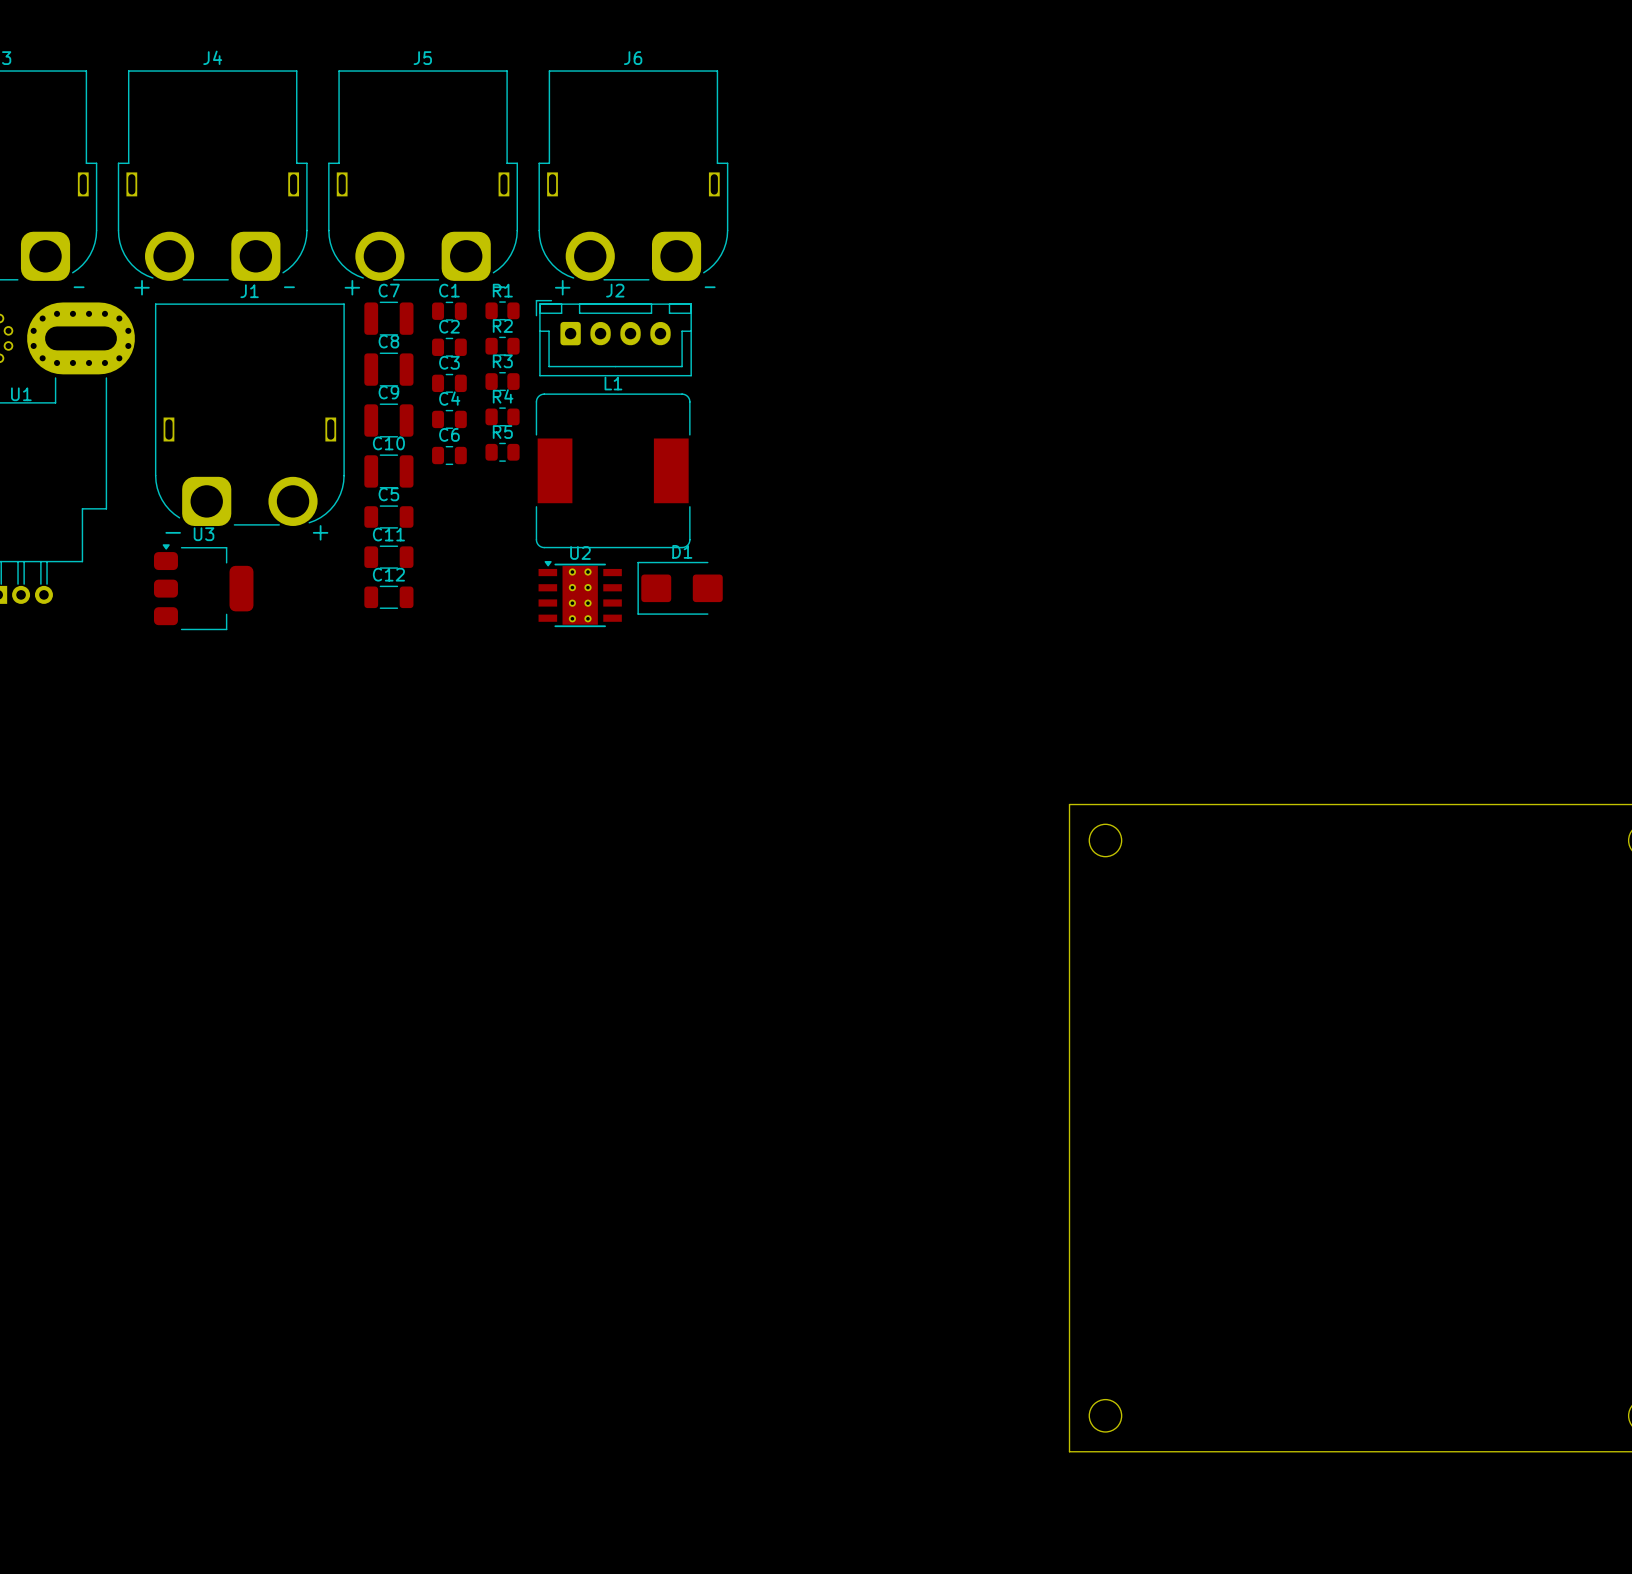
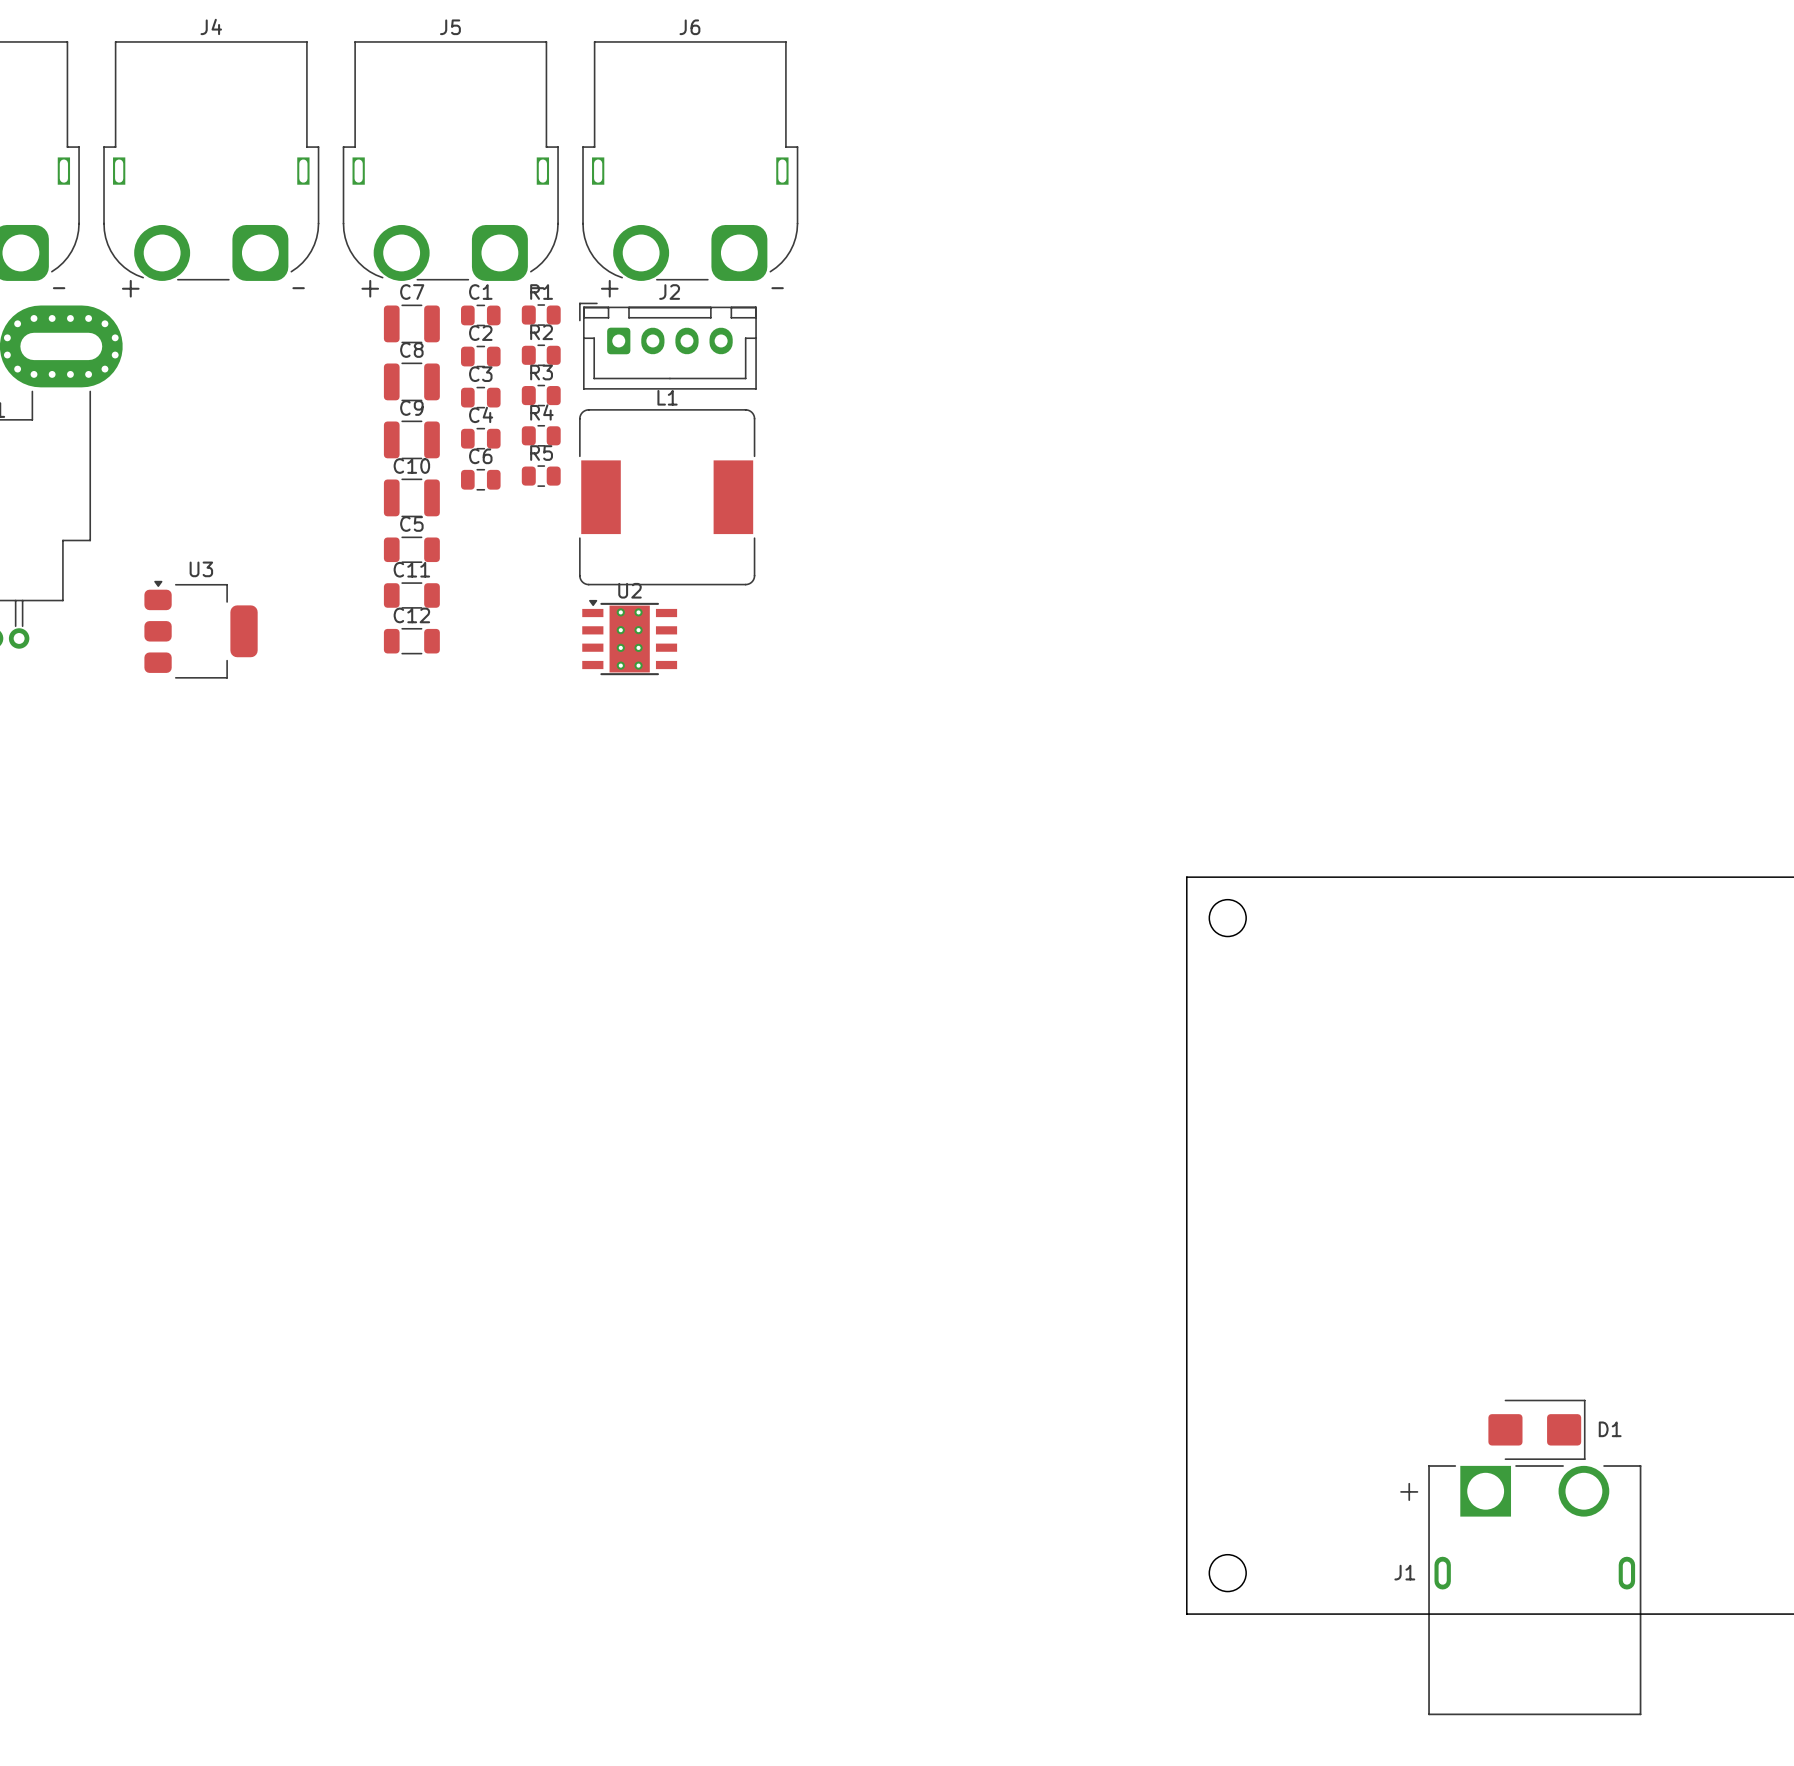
J1 name position: J1 (249, 291) -> J1 (1404, 1572)
J1 footprint: [154, 303, 345, 526] -> [1400, 1465, 1642, 1716]
D1 name position: D1 (682, 551) -> D1 (1610, 1429)
D1 rotation: 0° (680, 588) -> 180° (1536, 1429)
D1 position: (680, 588) -> (1536, 1429)

